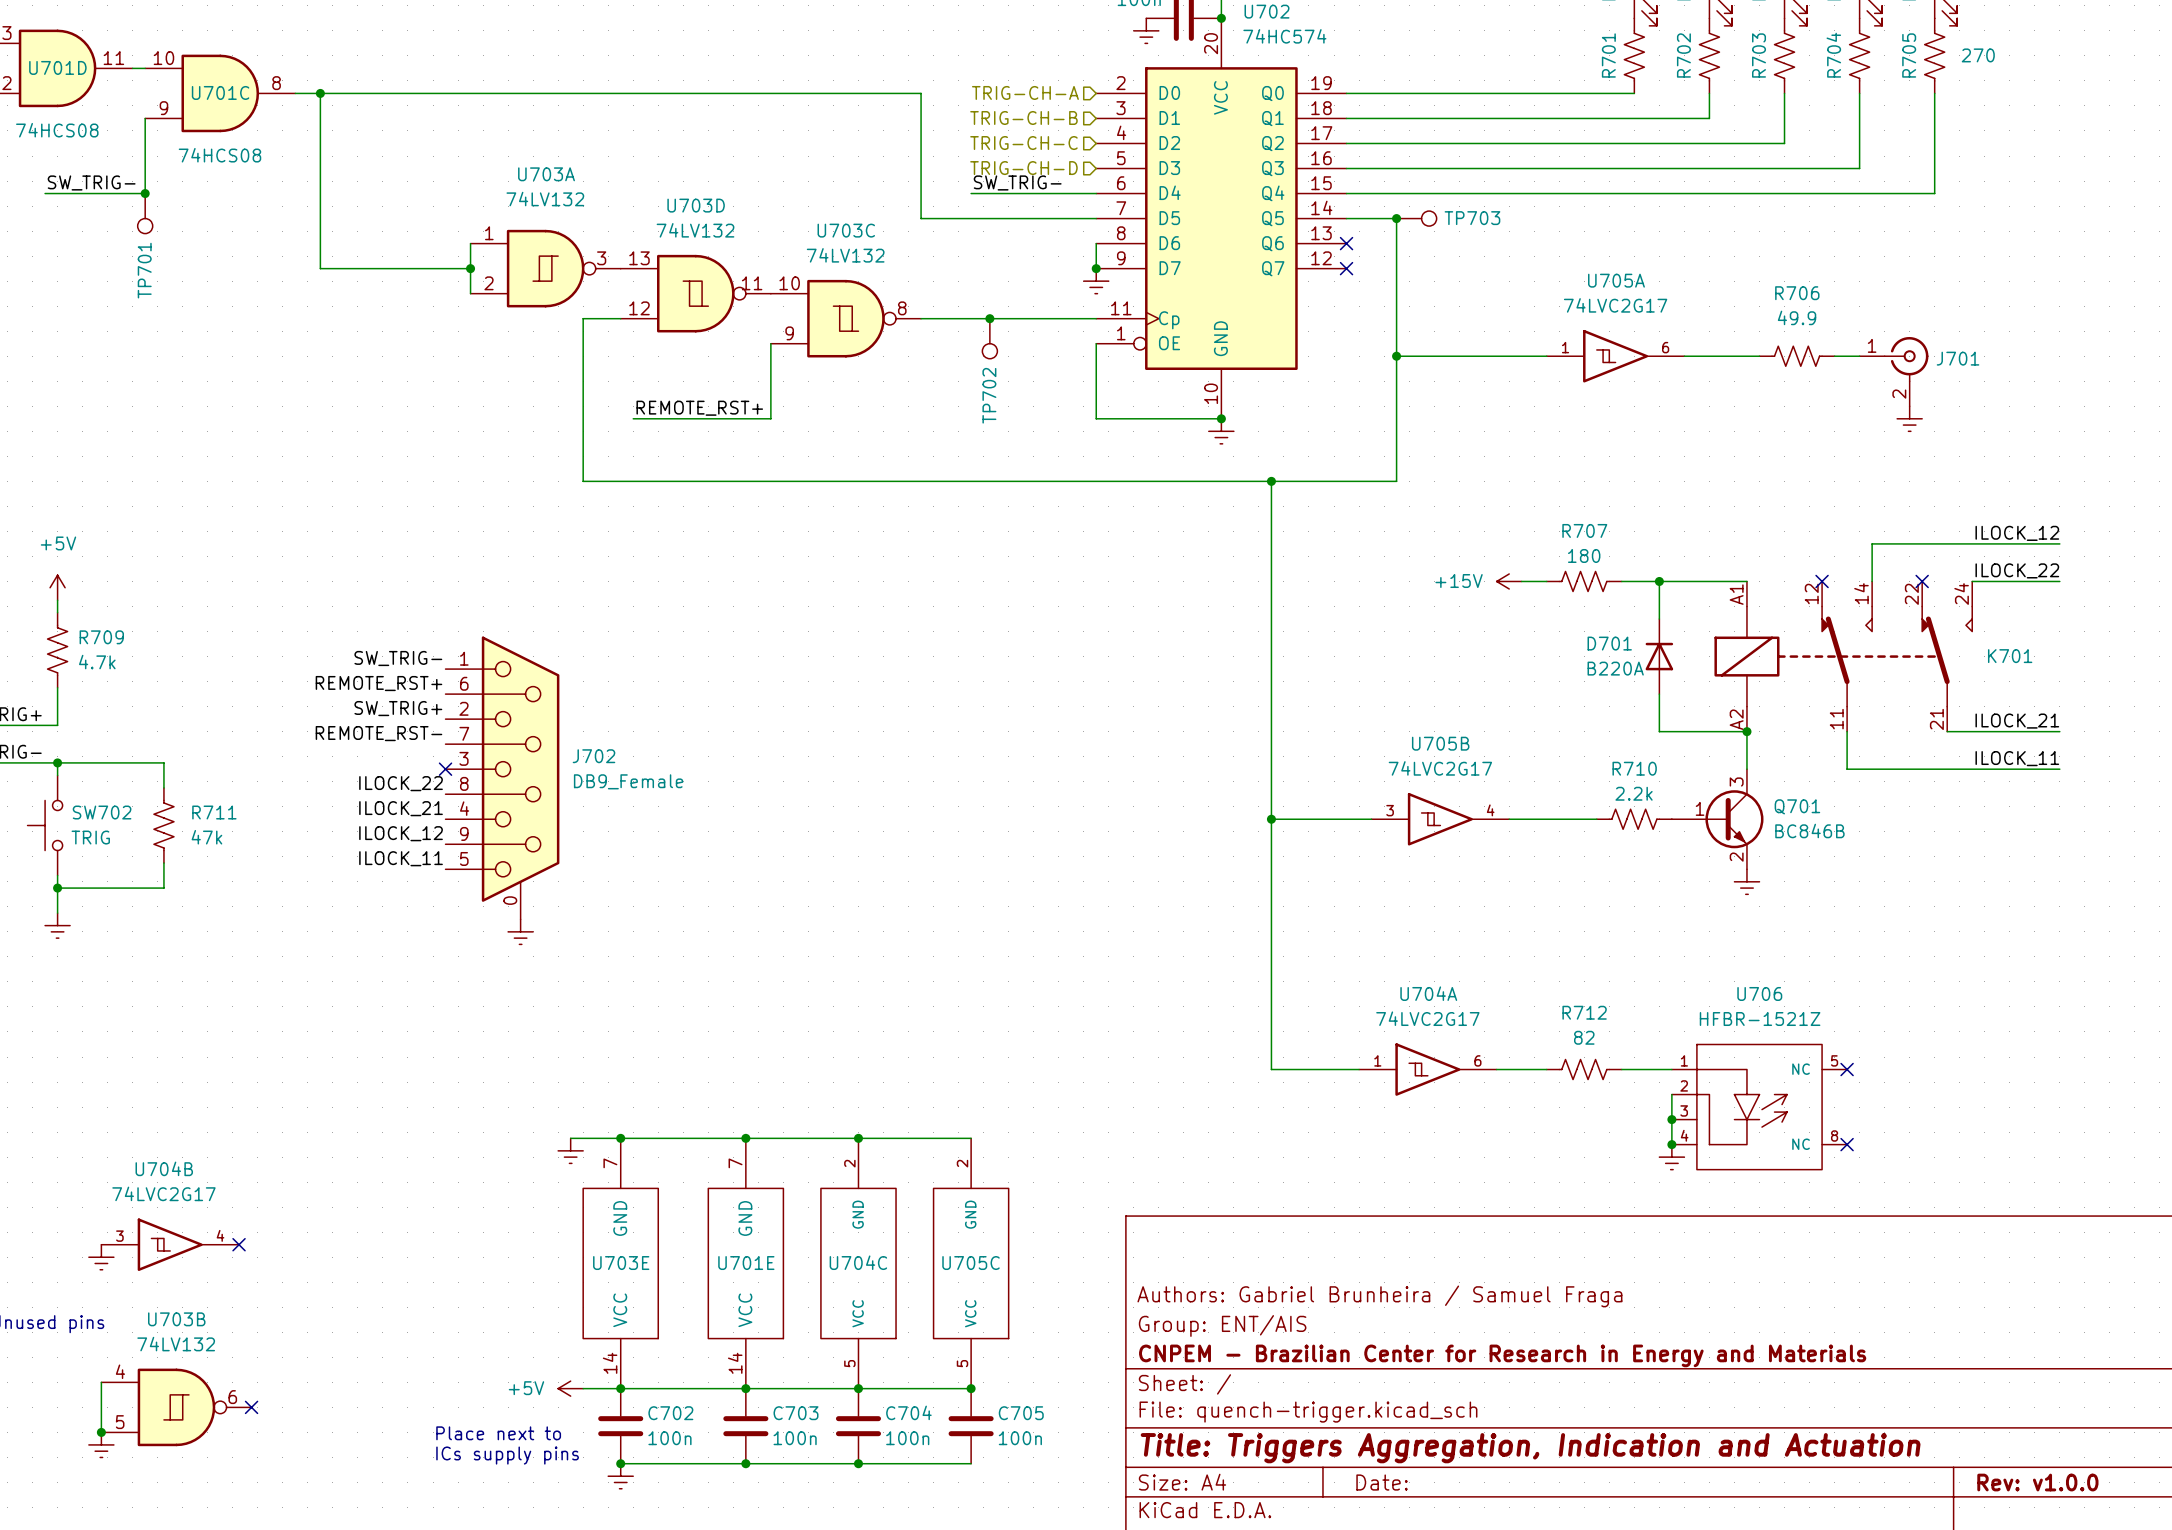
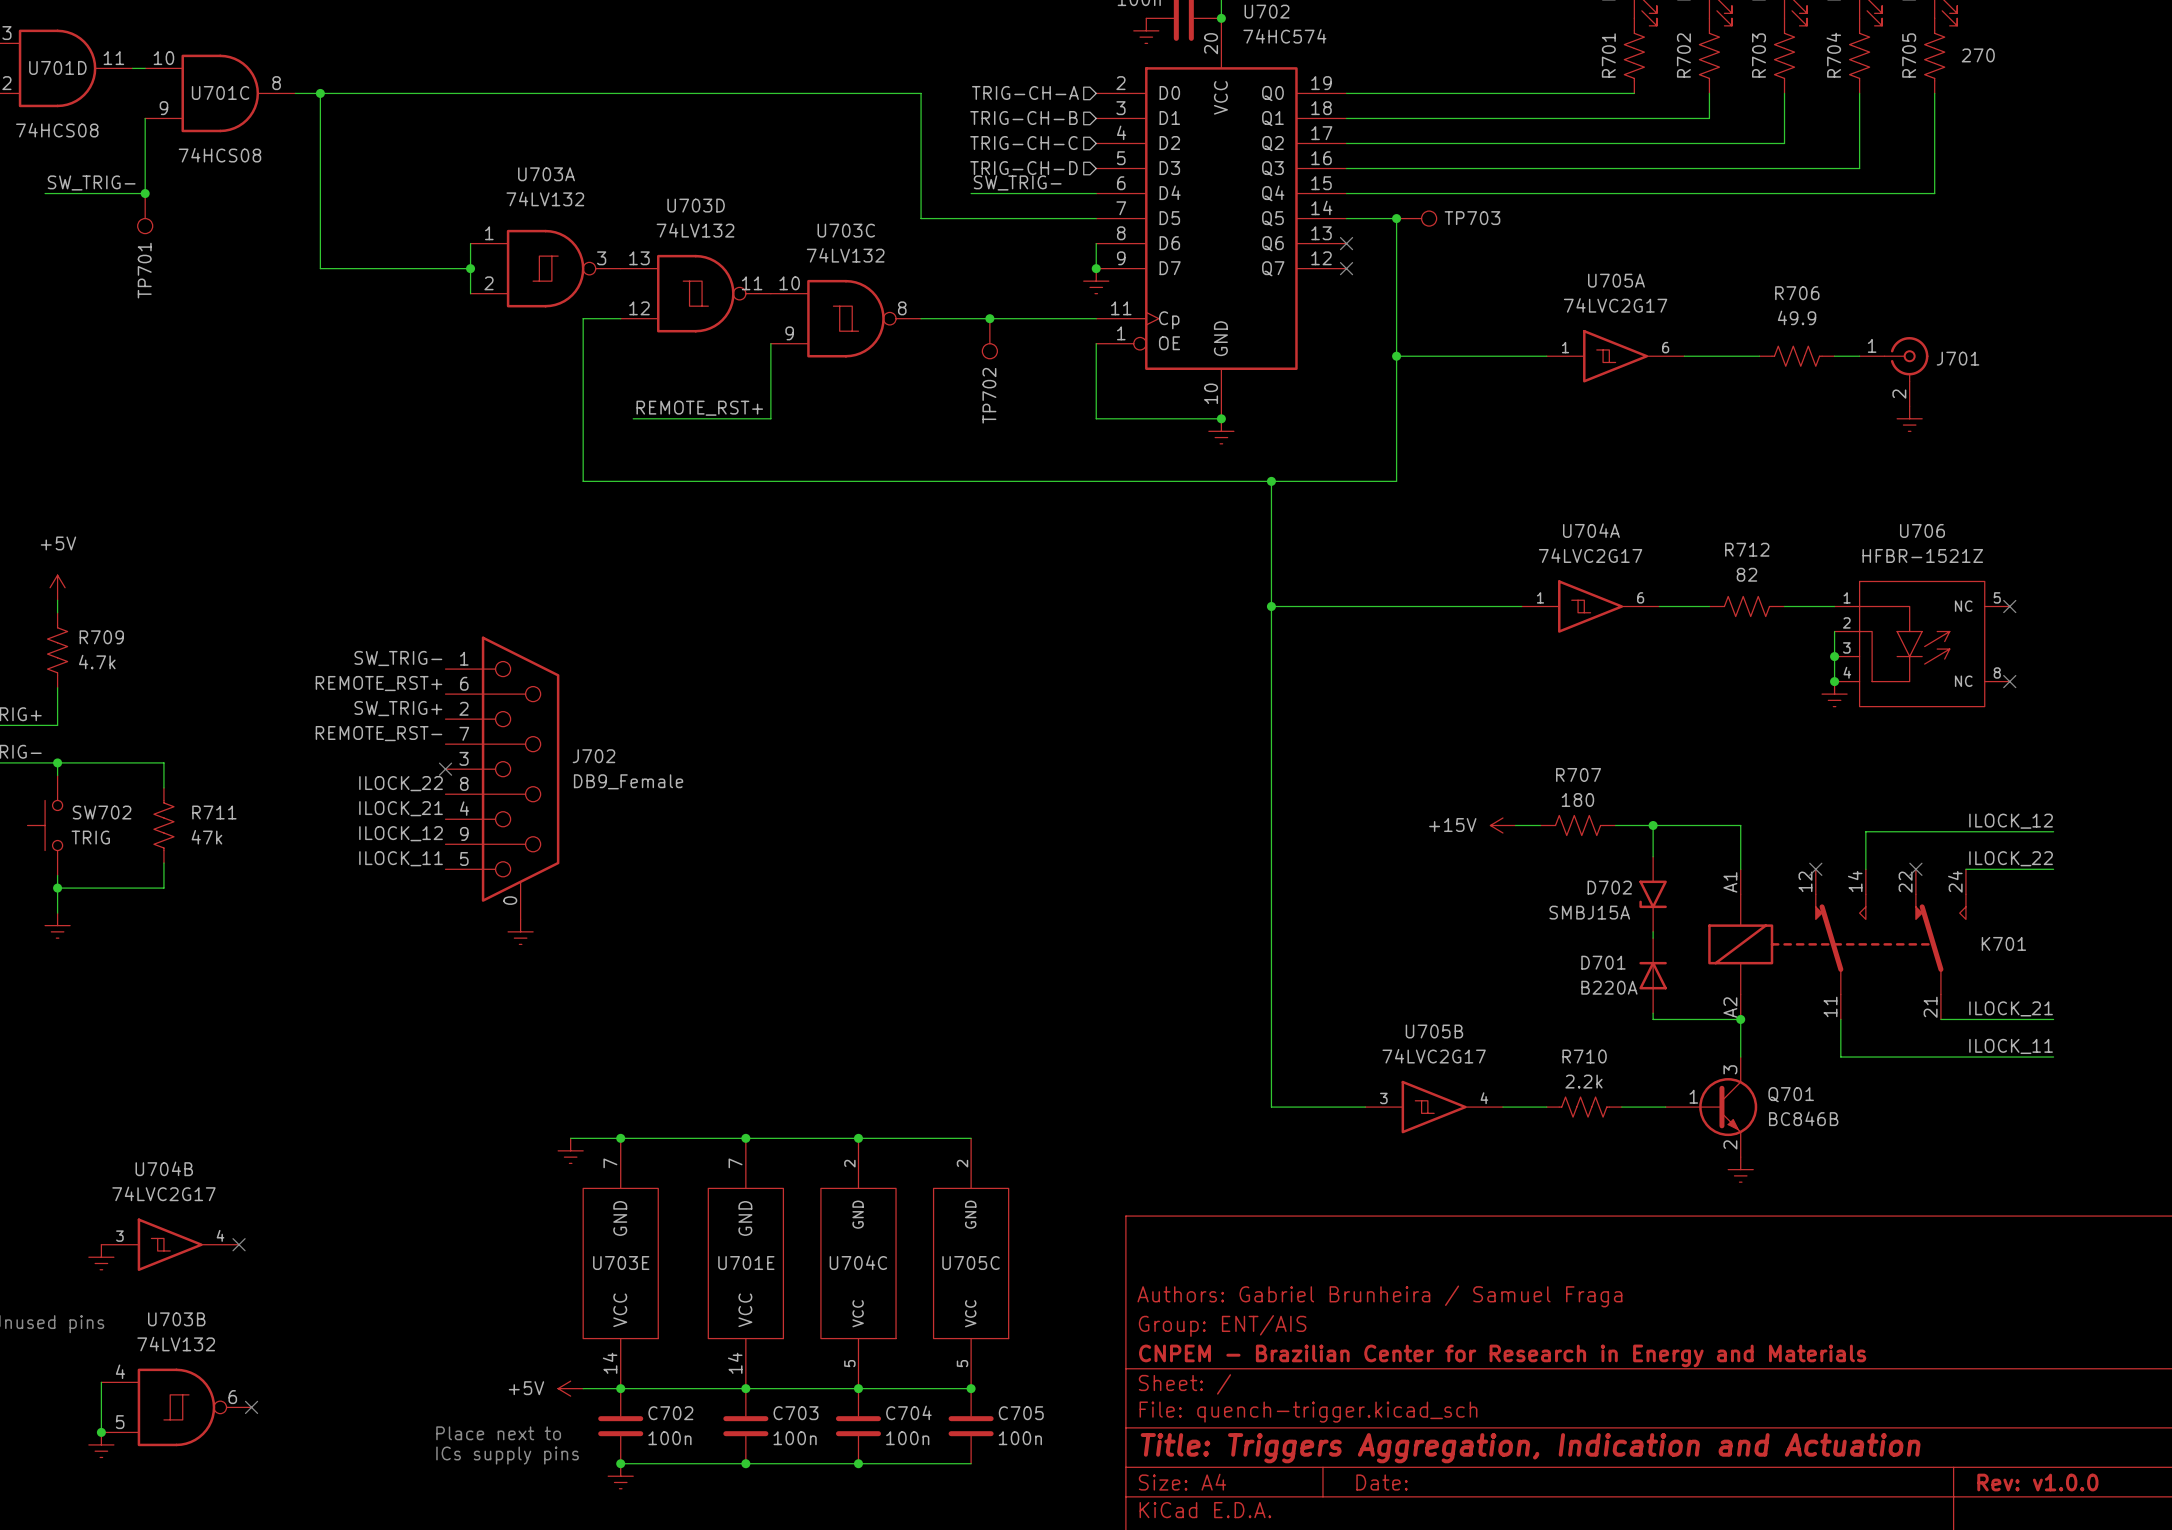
label: ILOCK_12 (2017, 533) -> none
wire: (2059, 543) (1872, 543) (1872, 581) -> none
label: ILOCK_22 (2017, 570) -> none
power symbol position: +15V (1509, 581) -> +15V (1502, 825)
wire: (1521, 581) (1546, 581) -> (1515, 825) (1540, 825)
R707 position: (1584, 581) -> (1578, 825)
wire: (1621, 581) (1746, 581) -> none
wire: (1659, 581) (1659, 619) -> none
junction: (1659, 581) -> none
no-connect mark: (1822, 581) -> none
no-connect mark: (1922, 581) -> none
wire: (1972, 581) (2059, 581) -> none
wire: none -> (1271, 606) (1521, 606)
junction: none -> (1271, 606)
wire: none -> (1659, 606) (1709, 606)
wire: none -> (1784, 606) (1834, 606)
no-connect mark: none -> (2009, 606)
wire: none -> (1834, 631) (1834, 681)
D701 position: (1659, 656) -> (1653, 975)
junction: none -> (1834, 656)
K701 position: (1843, 656) -> (1837, 944)
junction: none -> (1834, 681)
no-connect mark: none -> (2009, 681)
wire: (1659, 694) (1659, 731) (1746, 731) (1746, 769) -> none
power symbol: none -> (1834, 694)
label: ILOCK_21 (2017, 721) -> none
junction: (1746, 731) -> none
wire: (1847, 731) (1847, 769) (2059, 769) -> none
wire: (1947, 731) (2059, 731) -> none
label: ILOCK_11 (2017, 758) -> none
wire: (1271, 819) (1371, 819) -> none
junction: (1271, 819) -> none
U705B position: (1440, 819) -> (1434, 1107)
wire: (1509, 819) (1596, 819) -> none
R710 position: (1634, 819) -> (1584, 1107)
Q701 position: (1717, 819) -> (1711, 1107)
label: none -> ILOCK_12 (2011, 821)
wire: none -> (1615, 825) (1740, 825) (1740, 869)
wire: none -> (1653, 825) (1653, 856)
junction: none -> (1653, 825)
wire: none -> (2053, 831) (1865, 831) (1865, 869)
label: none -> ILOCK_22 (2011, 858)
no-connect mark: none -> (1815, 869)
no-connect mark: none -> (1915, 869)
wire: none -> (1965, 869) (2053, 869)
power symbol: (1746, 881) -> none
D702: none -> SMBJ15A (1653, 894)
wire: none -> (1653, 931) (1653, 938)
label: none -> ILOCK_21 (2011, 1008)
wire: none -> (1653, 1013) (1653, 1019) (1740, 1019) (1740, 1057)
junction: none -> (1740, 1019)
wire: none -> (1840, 1019) (1840, 1057) (2053, 1057)
wire: none -> (1940, 1019) (2053, 1019)
label: none -> ILOCK_11 (2011, 1046)
wire: (1271, 1069) (1359, 1069) -> (1271, 1069) (1271, 1107) (1365, 1107)
U704A position: (1427, 1069) -> (1590, 606)
wire: (1496, 1069) (1546, 1069) -> none
R712 position: (1584, 1069) -> (1746, 606)
wire: (1621, 1069) (1671, 1069) -> none
no-connect mark: (1847, 1069) -> none
wire: (1671, 1094) (1671, 1144) -> none
wire: none -> (1502, 1107) (1546, 1107)
wire: none -> (1621, 1107) (1665, 1107)
U706 position: (1759, 1107) -> (1922, 644)
junction: (1671, 1119) -> none
junction: (1671, 1144) -> none
no-connect mark: (1847, 1144) -> none
power symbol position: (1671, 1157) -> (1740, 1169)

